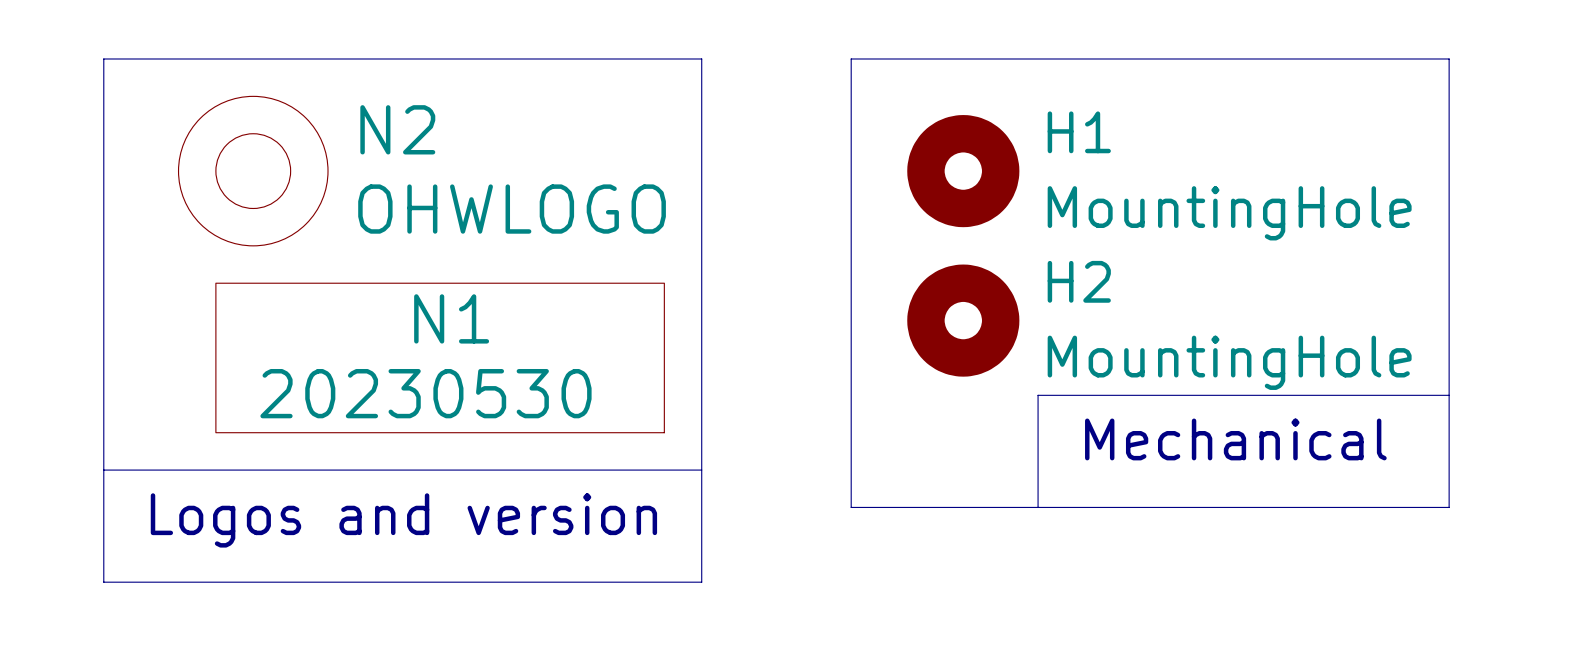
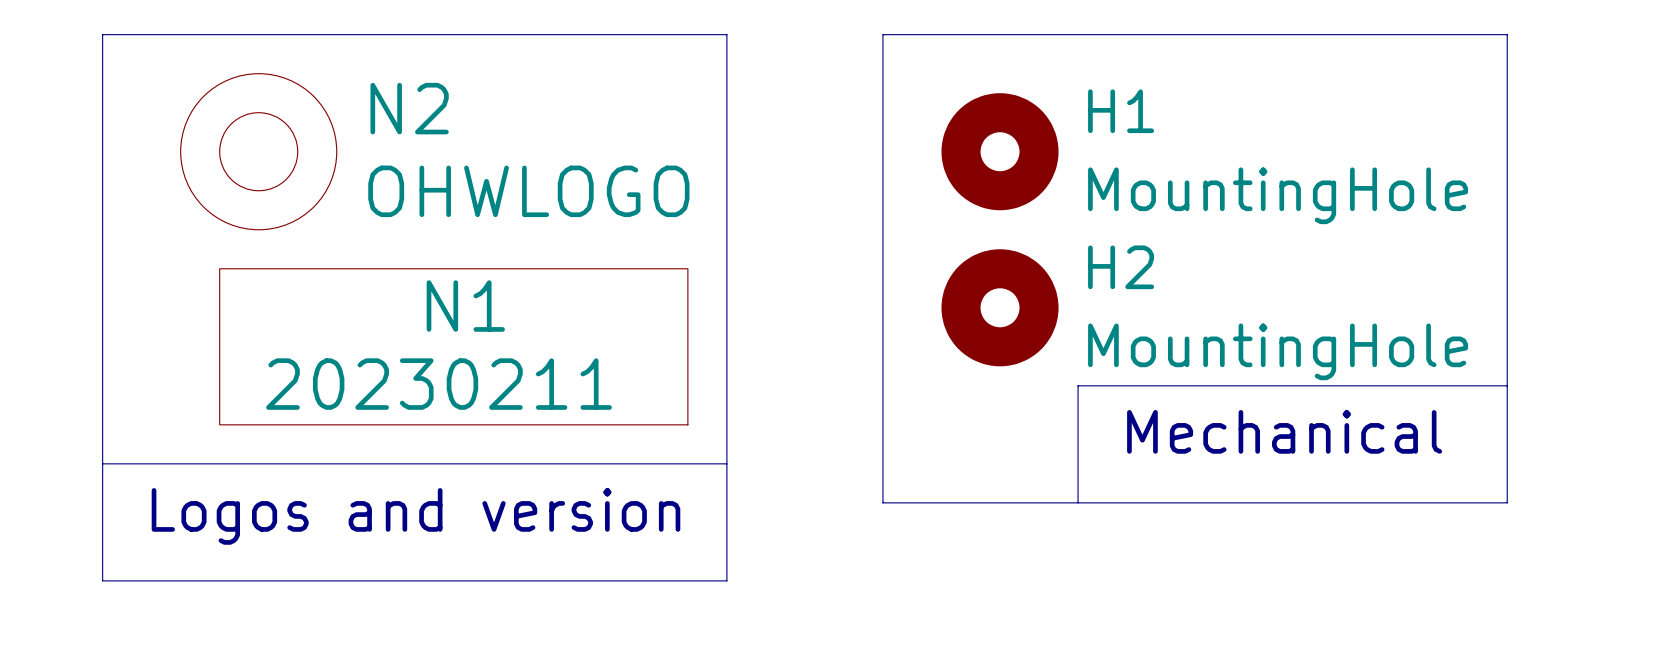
N1 value: 20230530 (425, 393) -> 20230211 (439, 384)

